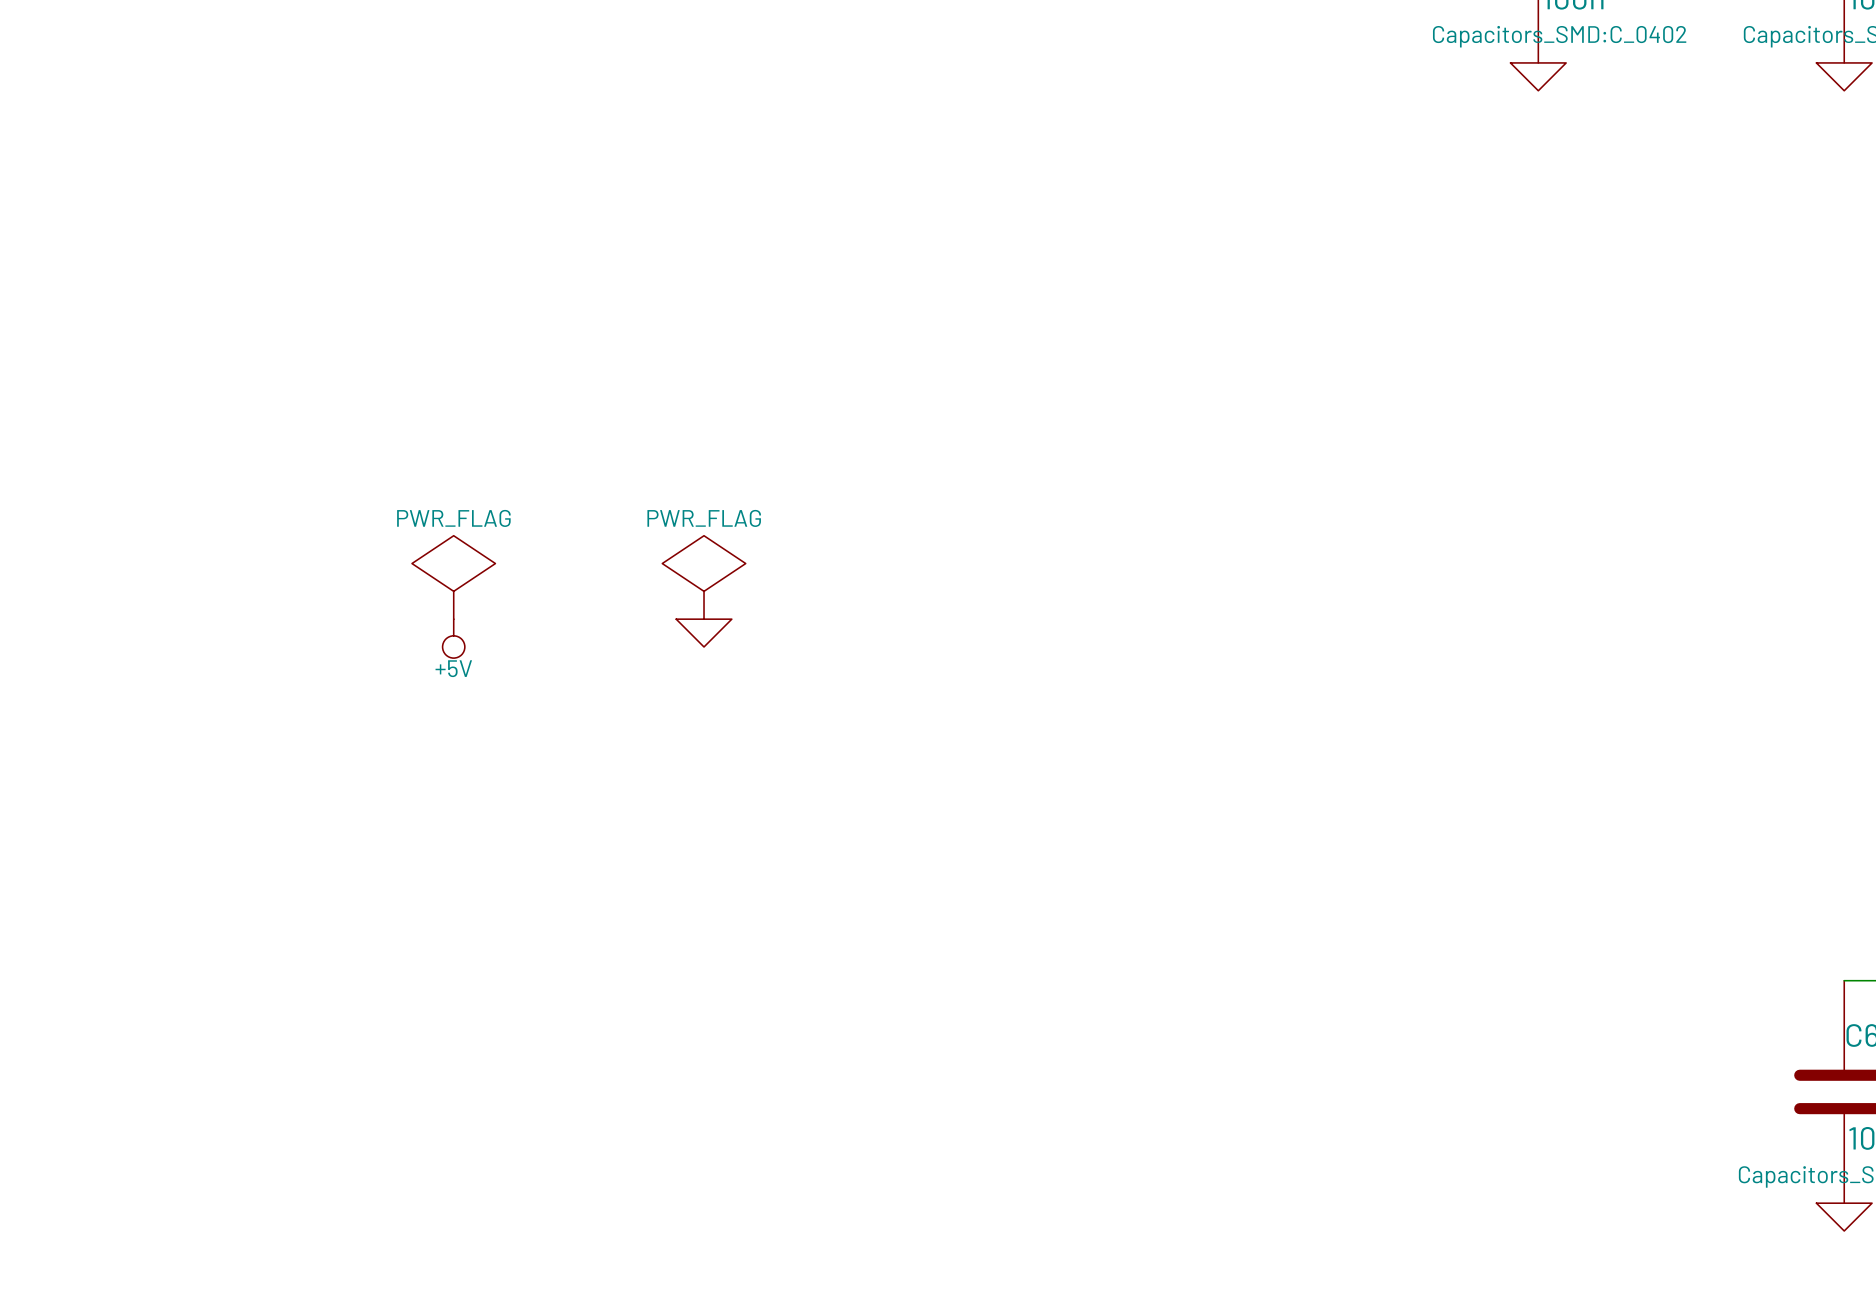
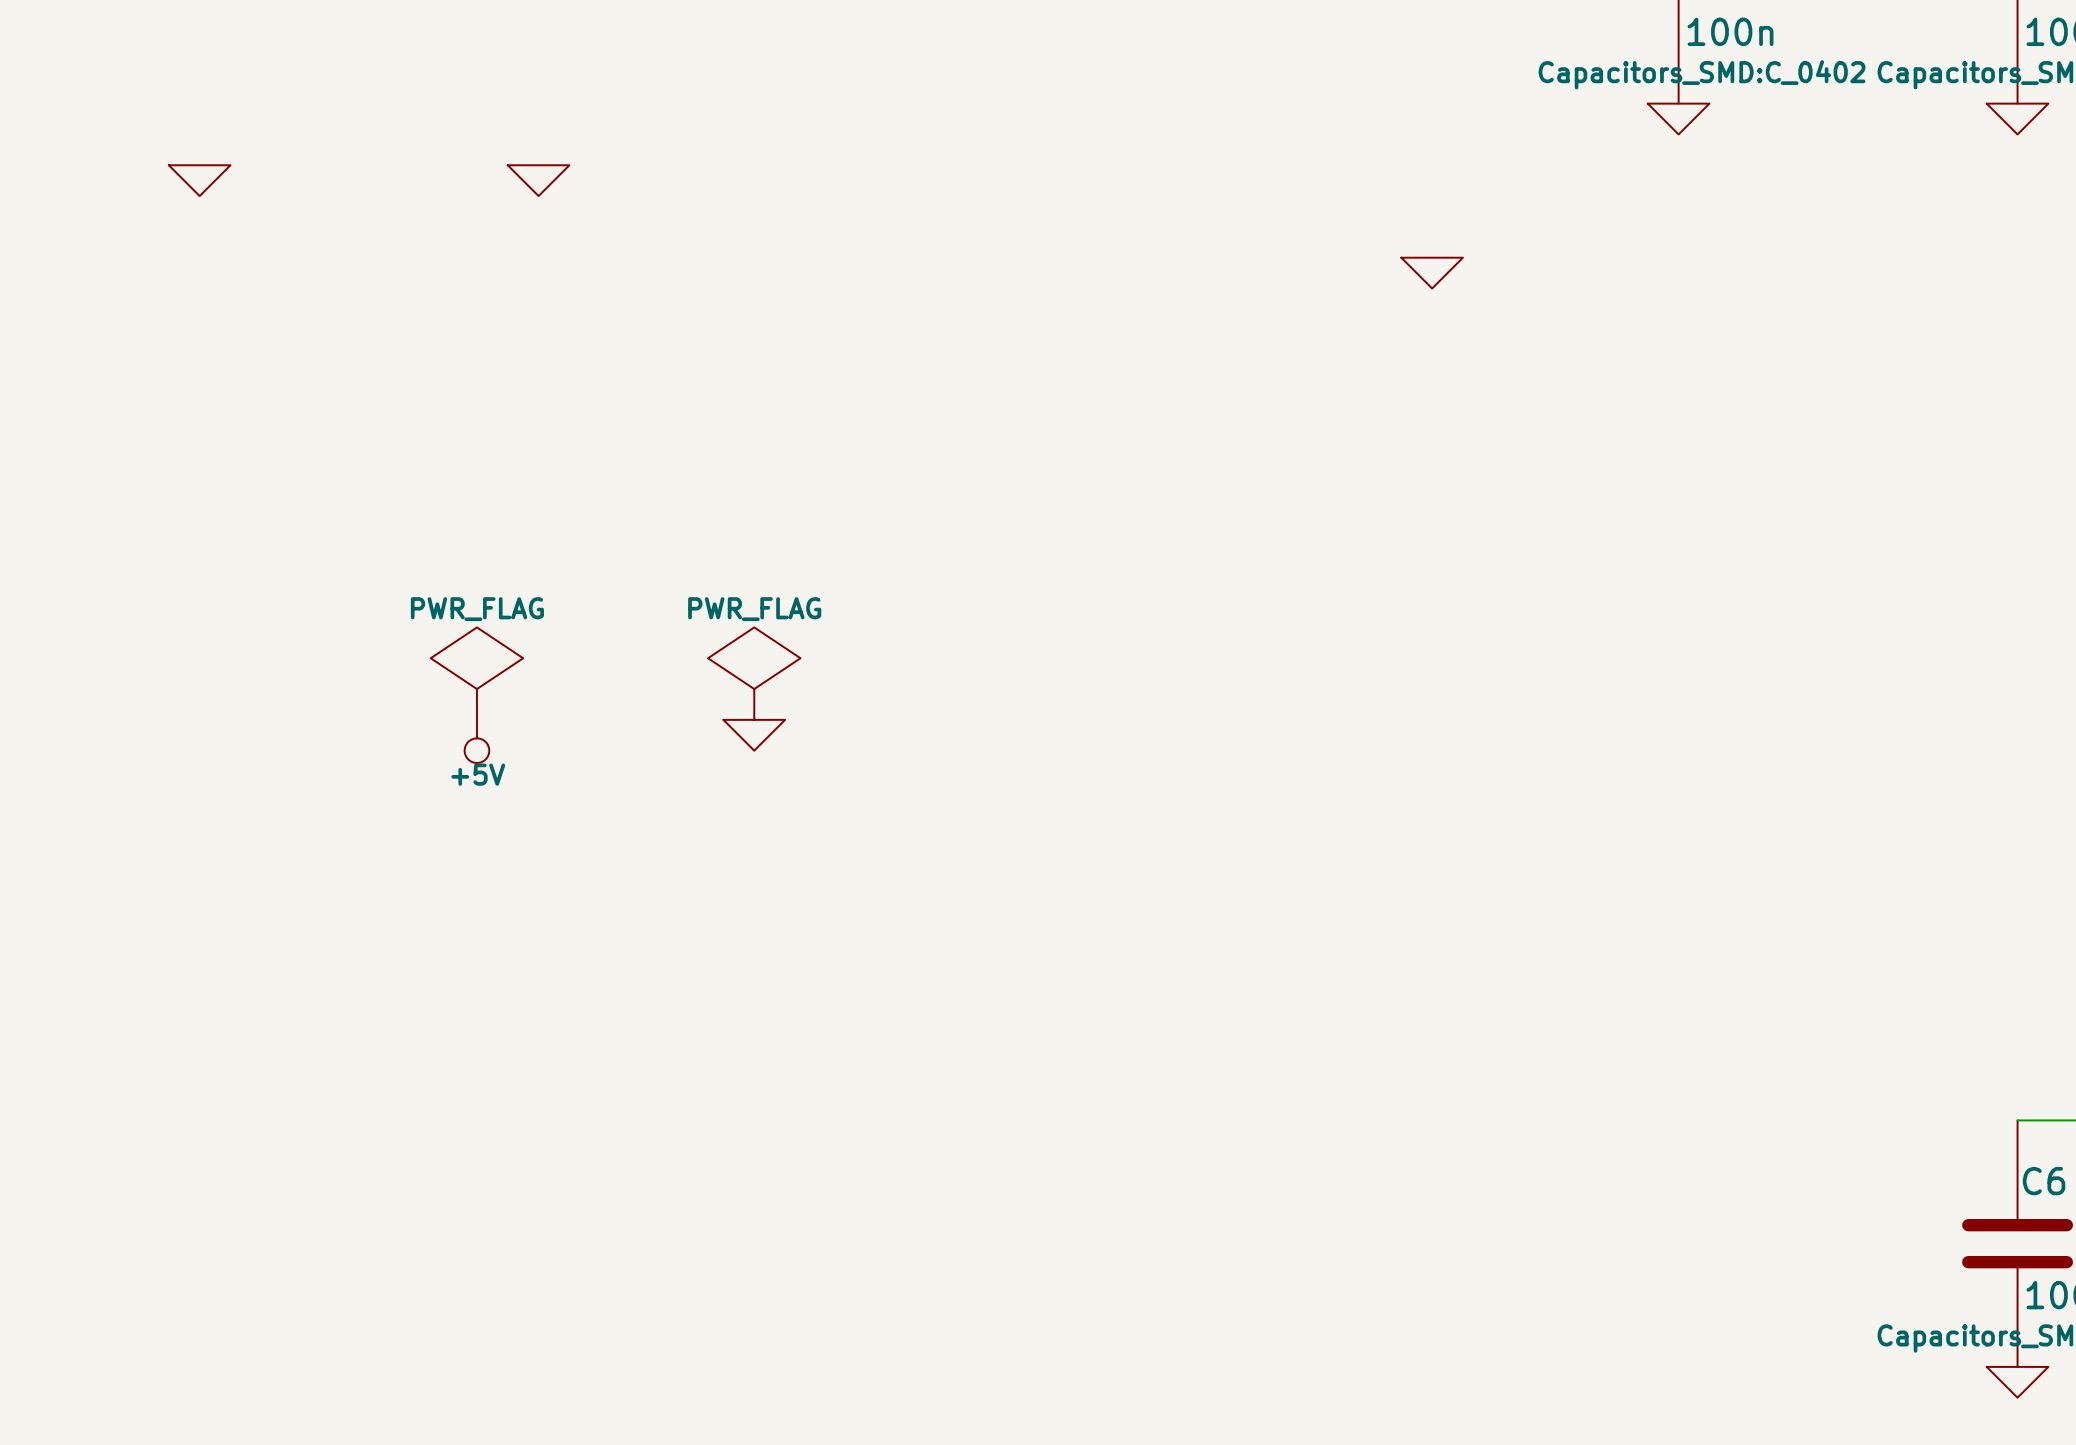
power symbol: none -> (199, 180)
power symbol: none -> (538, 180)
power symbol: none -> (1432, 273)

